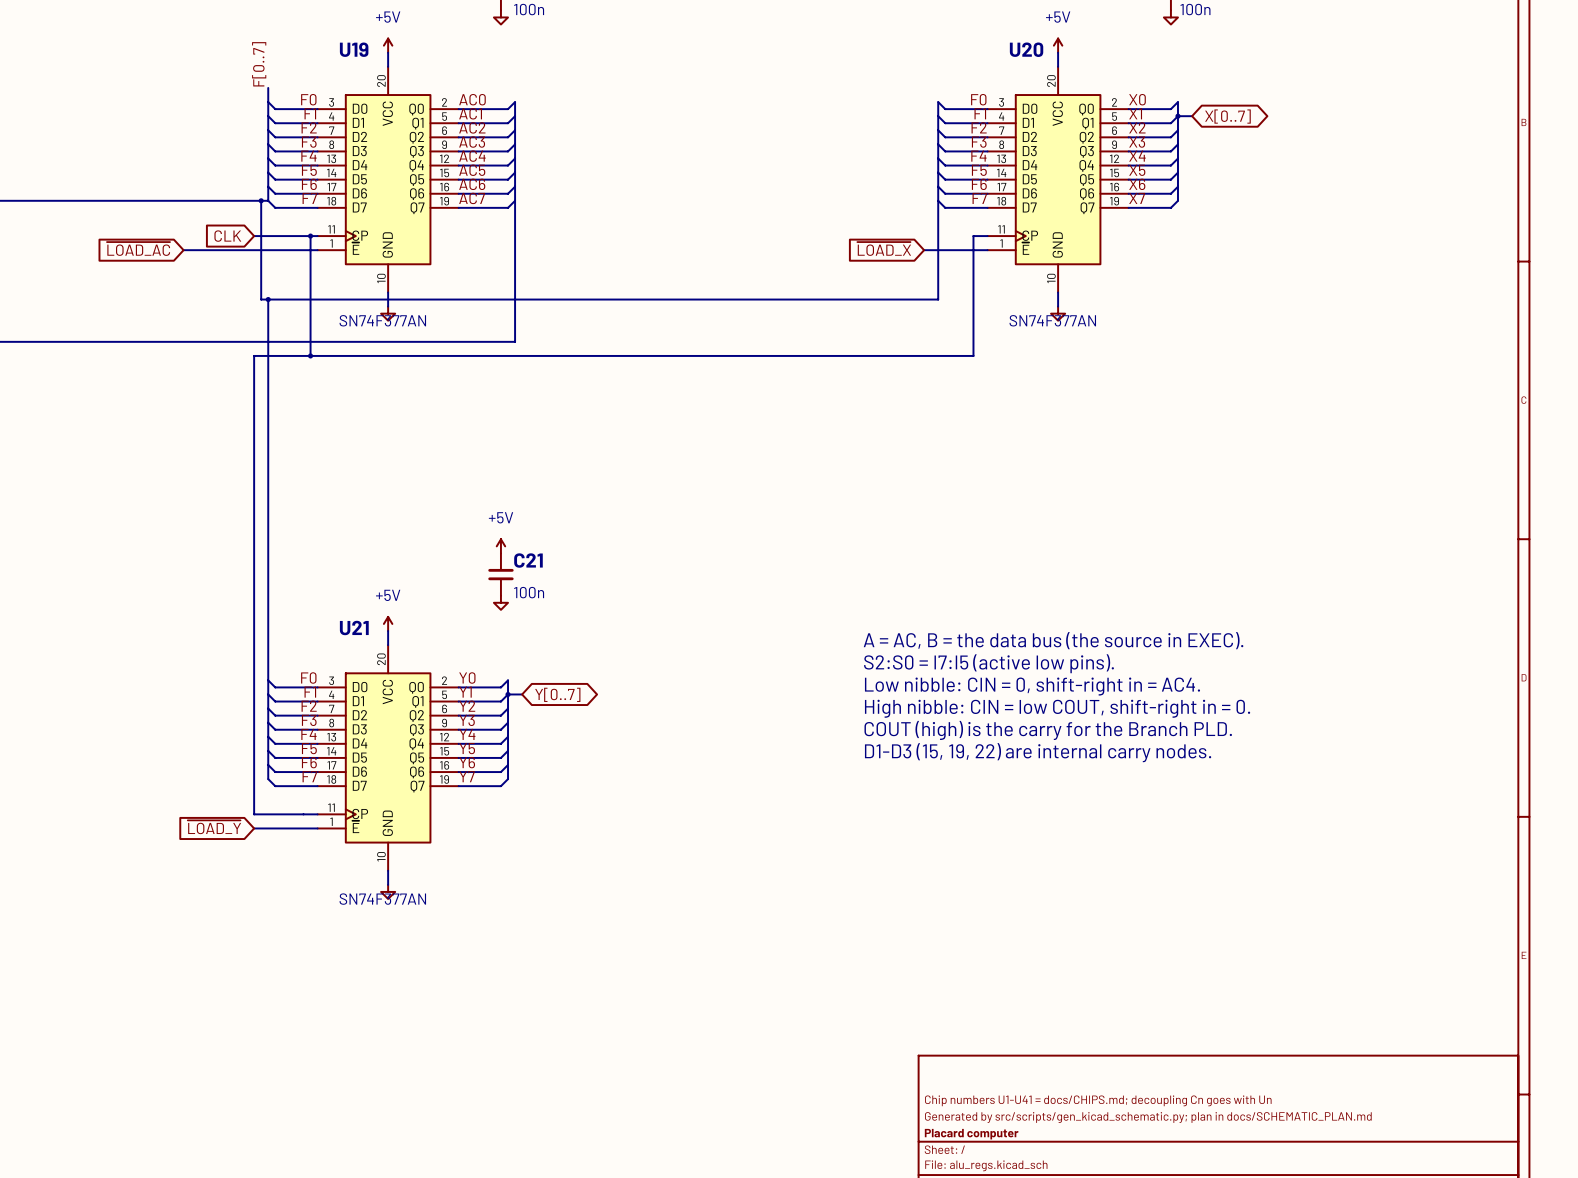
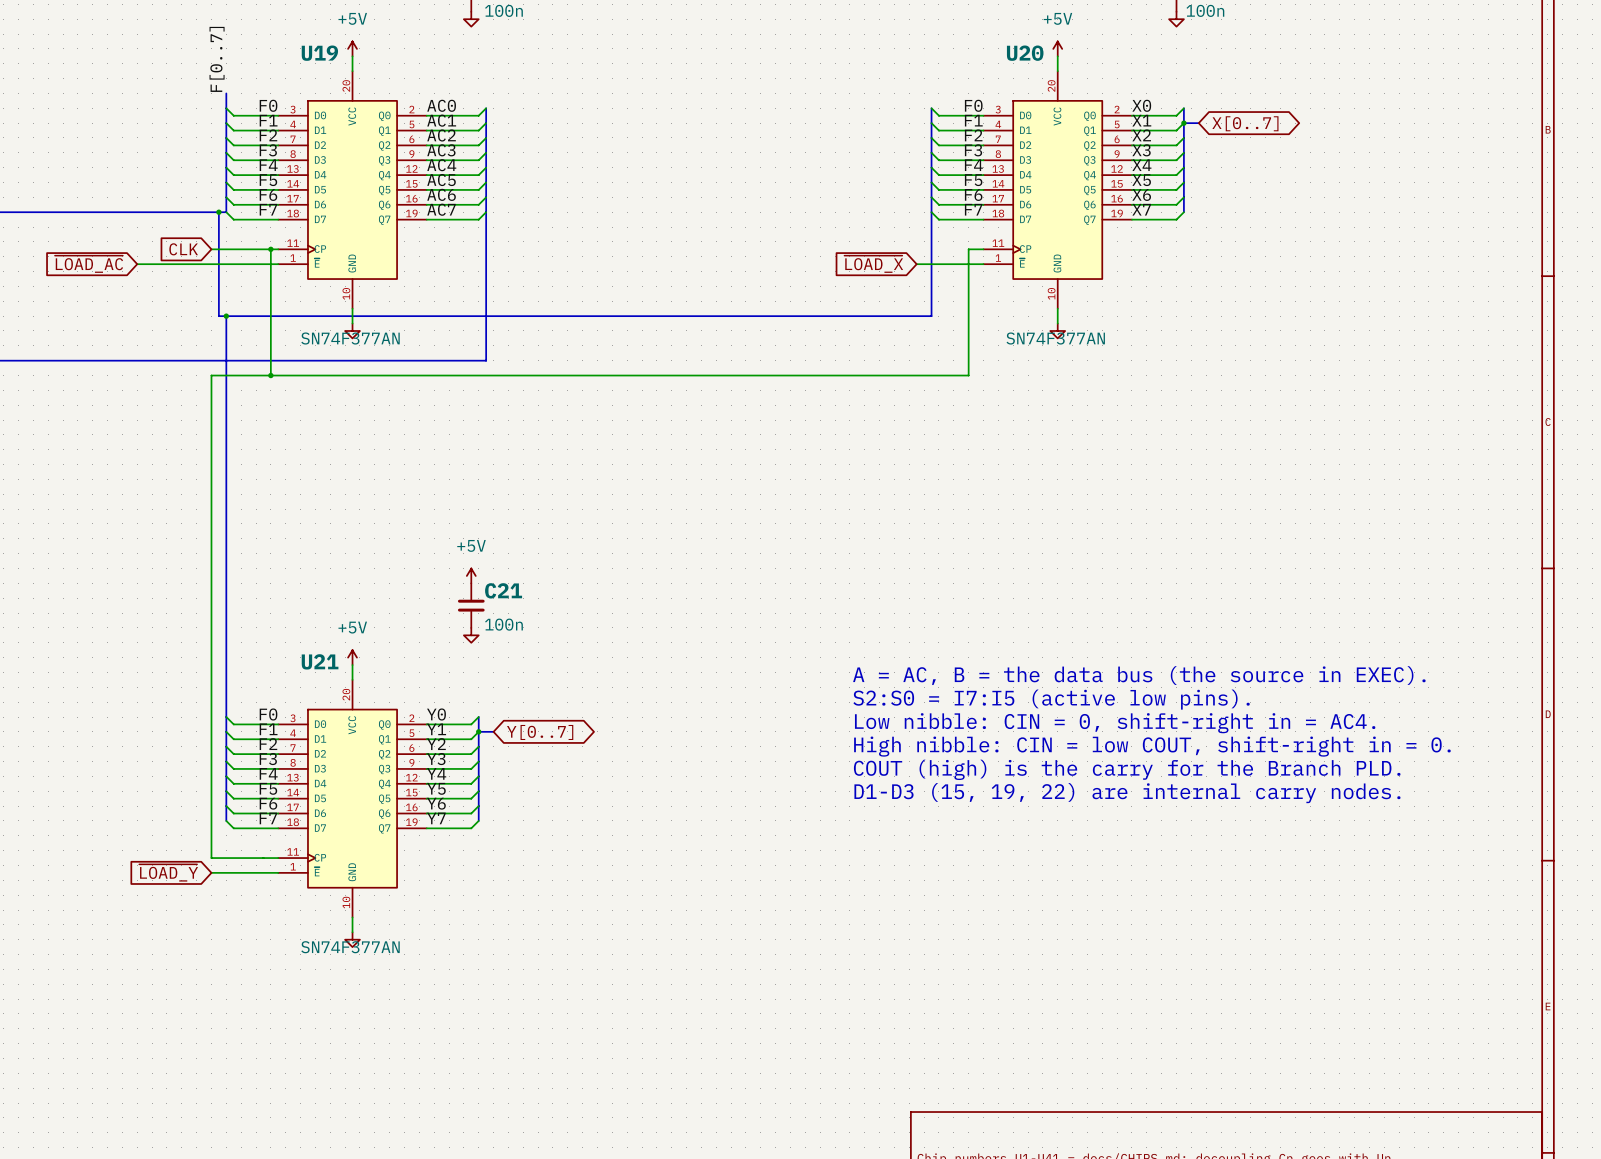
U19 symbol: [317, 66, 459, 293] -> [278, 71, 427, 309]
U20 symbol: [987, 66, 1129, 293] -> [983, 71, 1132, 309]
U21 symbol: [317, 645, 459, 871] -> [278, 679, 427, 918]

